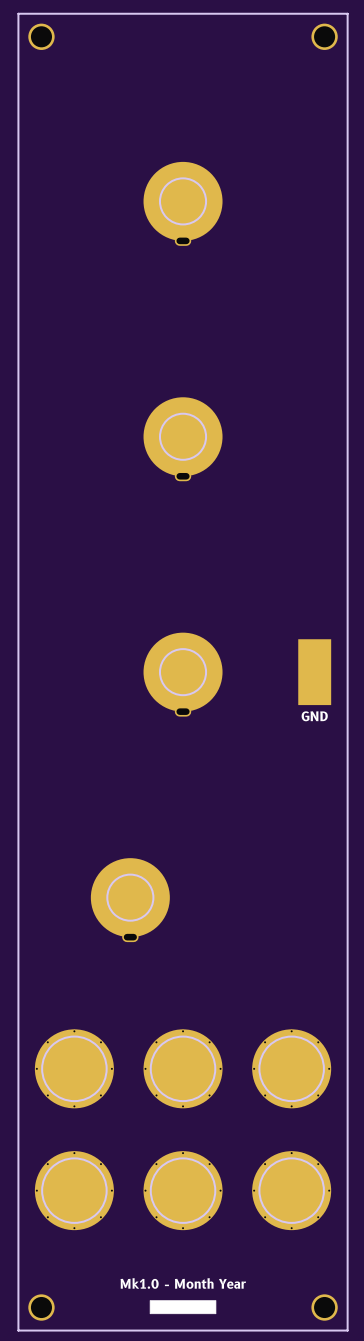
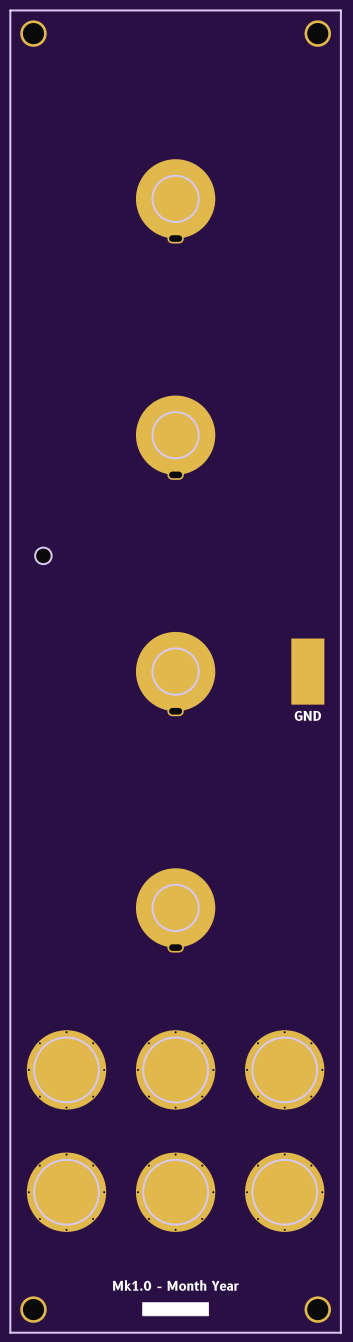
part: none -> (43, 555)
part position: (130, 900) -> (175, 910)

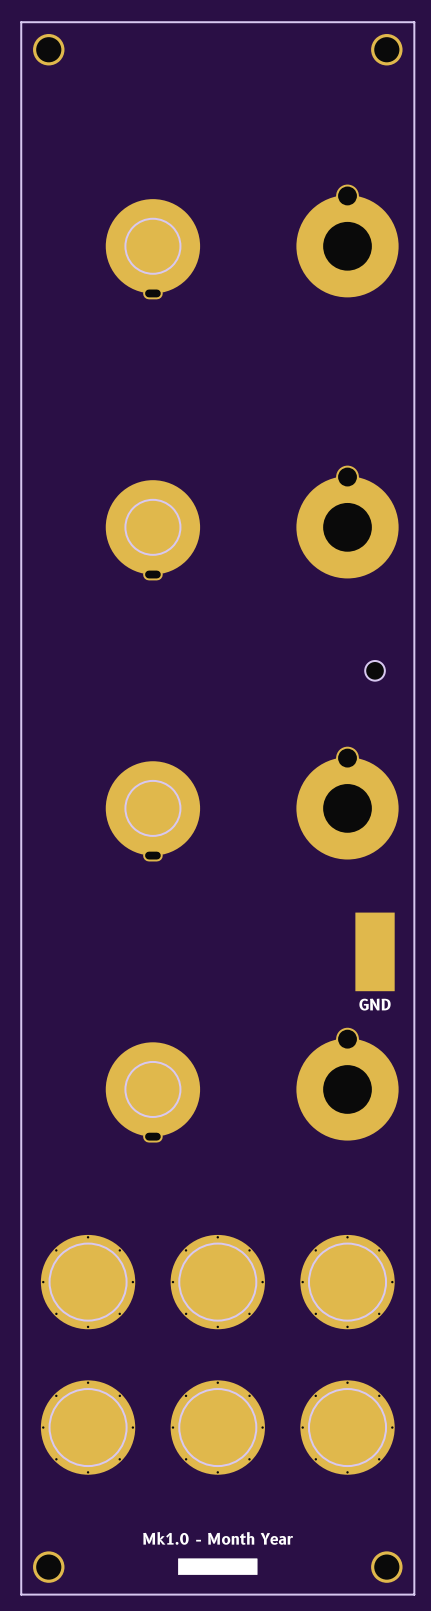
part: none -> (347, 240)
part position: (175, 201) -> (152, 249)
part: none -> (347, 522)
part position: (175, 437) -> (152, 530)
part: (43, 555) -> none
part: none -> (375, 670)
part: none -> (347, 803)
part position: (307, 671) -> (375, 951)
part position: (175, 674) -> (152, 811)
part: none -> (347, 1084)
part position: (175, 910) -> (152, 1092)

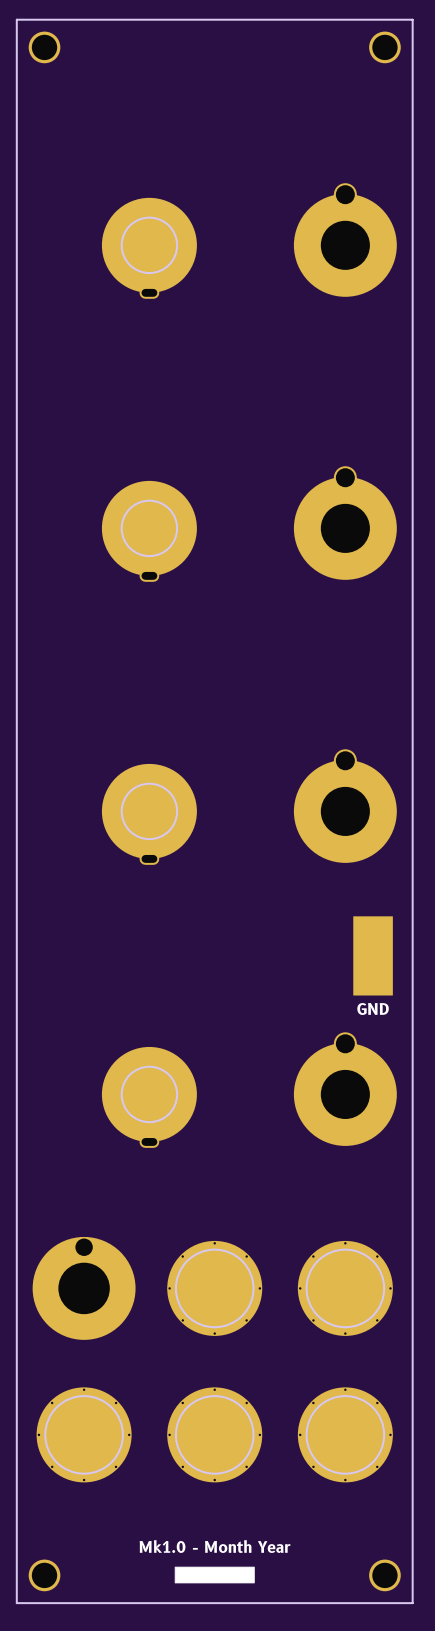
part: (375, 670) -> none
part footprint: [40, 1234, 136, 1330] -> [32, 1236, 136, 1340]

